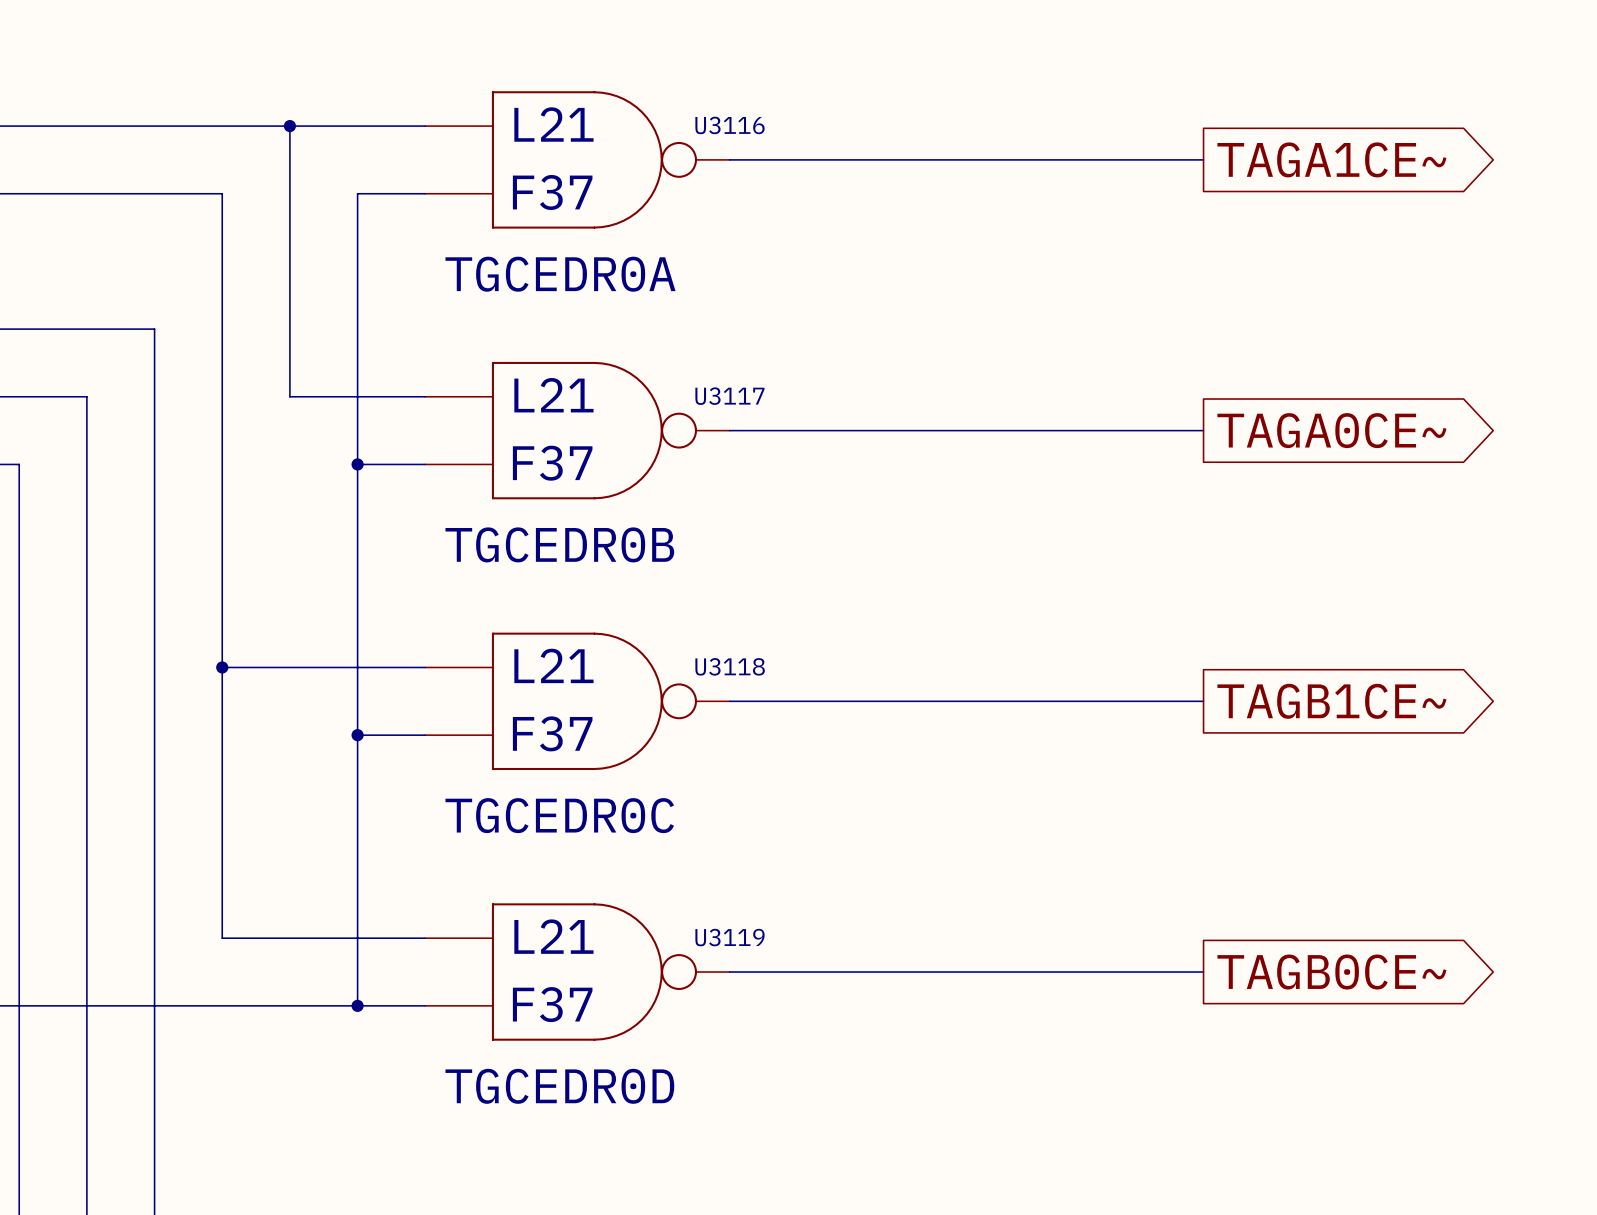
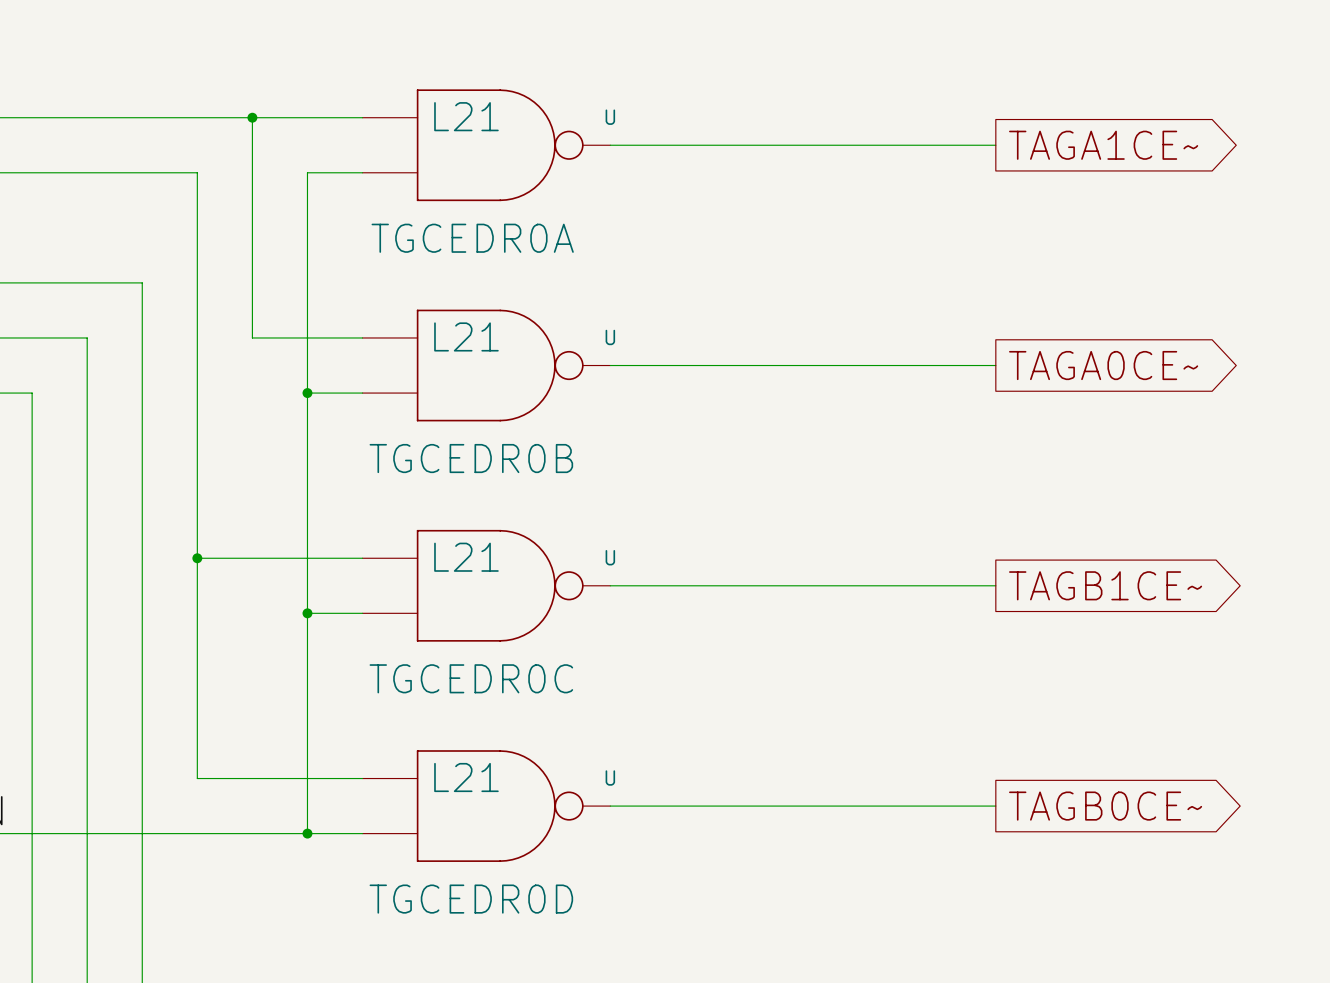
U3116 name: U3116 (730, 125) -> U (610, 117)
U3116 value: F37 (552, 192) -> none
U3117 name: U3117 (729, 396) -> U (610, 337)
U3117 value: F37 (552, 463) -> none
U3118 name: U3118 (730, 666) -> U (610, 557)
U3118 value: F37 (552, 733) -> none
U3119 name: U3119 (730, 937) -> U (610, 778)
U3119 value: F37 (552, 1004) -> none

